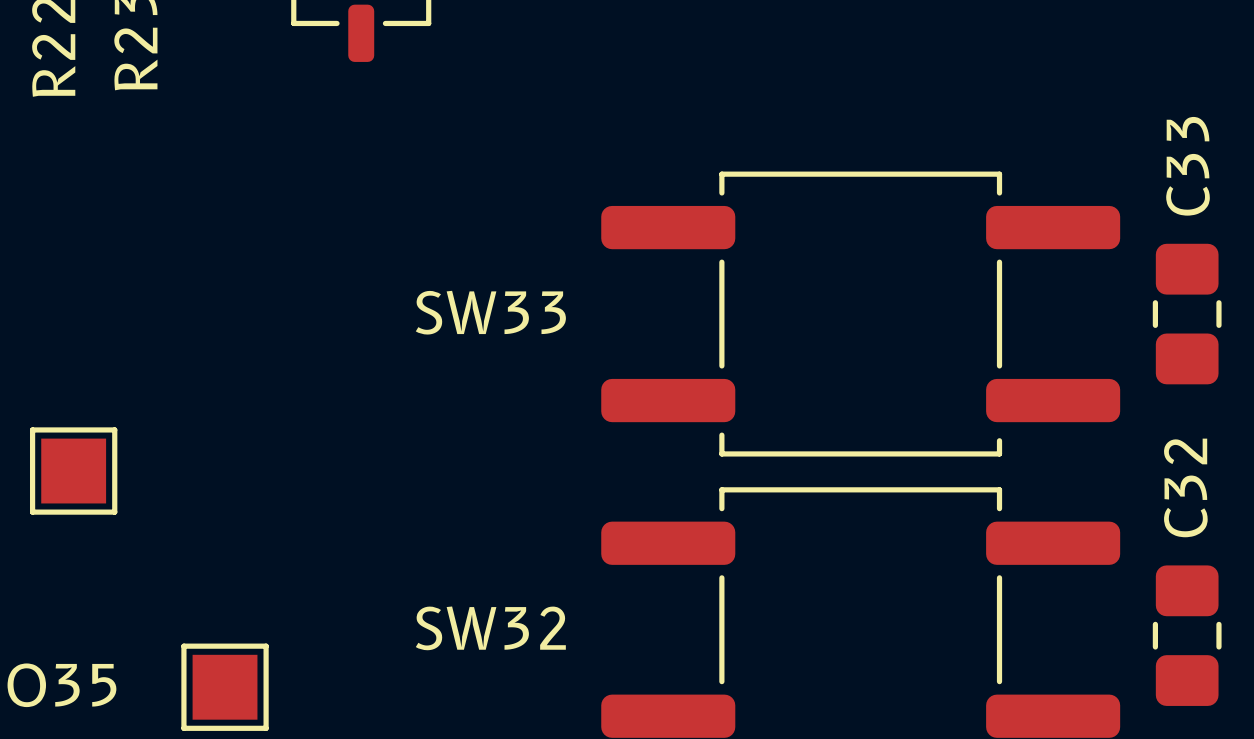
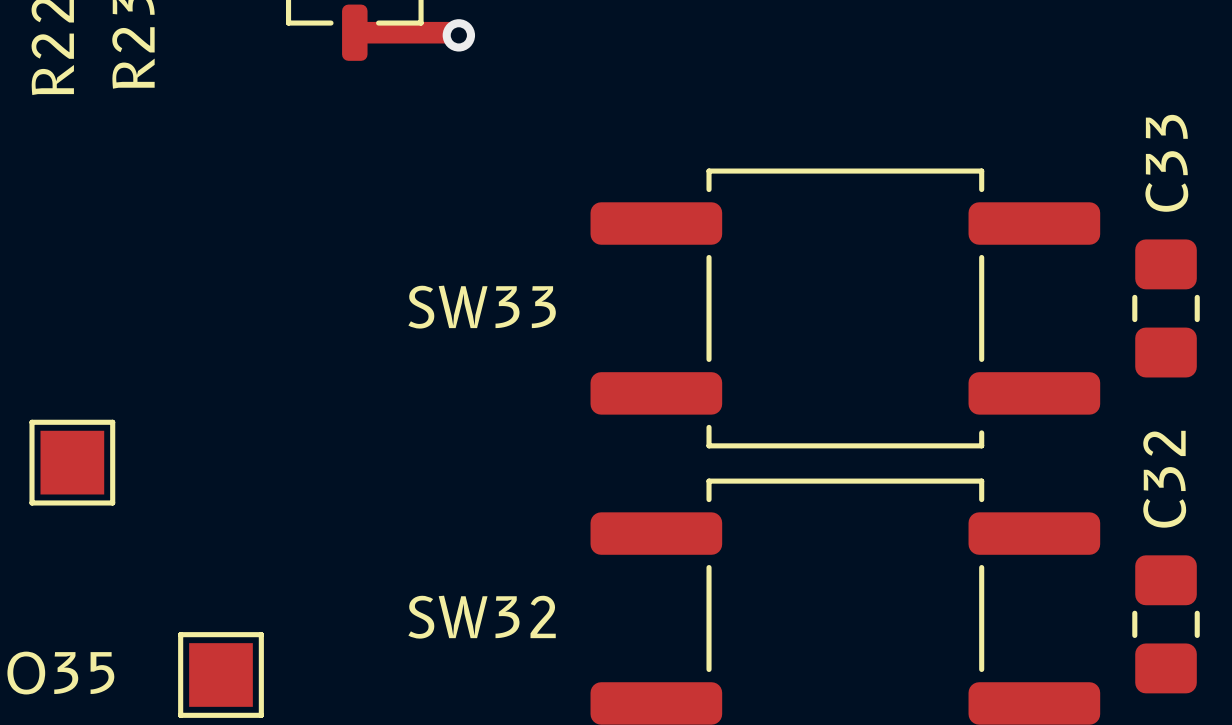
track: none -> (354, 32) (456, 32) (458, 35)
via: none -> (458, 35)

